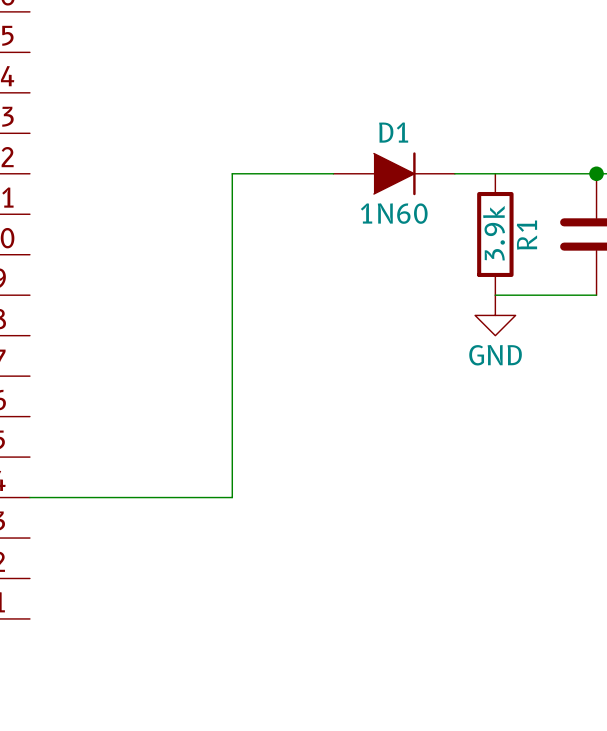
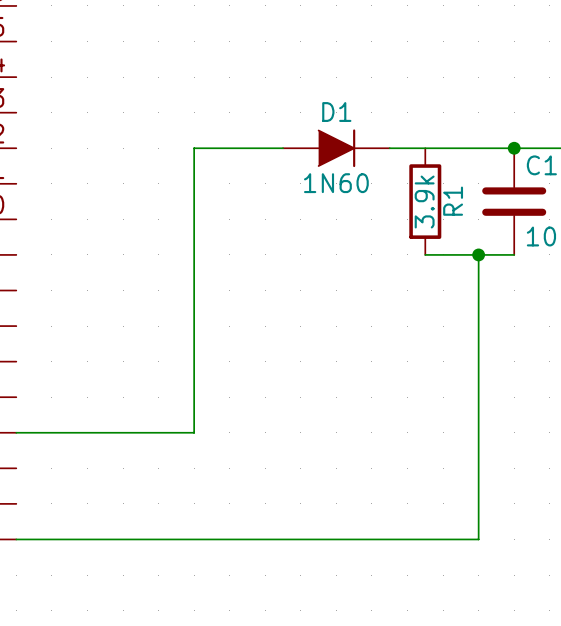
wire: none -> (478, 254) (478, 539) (16, 539)
junction: none -> (478, 254)
power symbol: GND (495, 315) -> none

